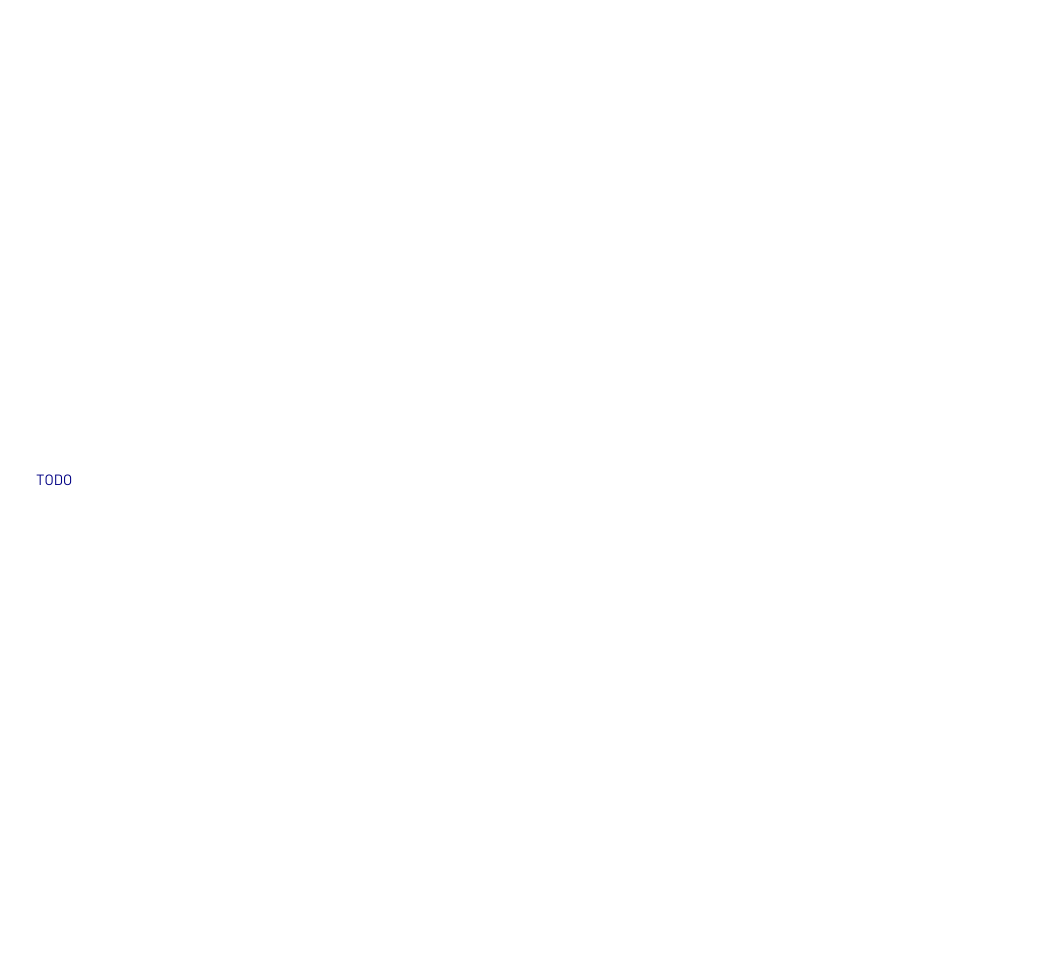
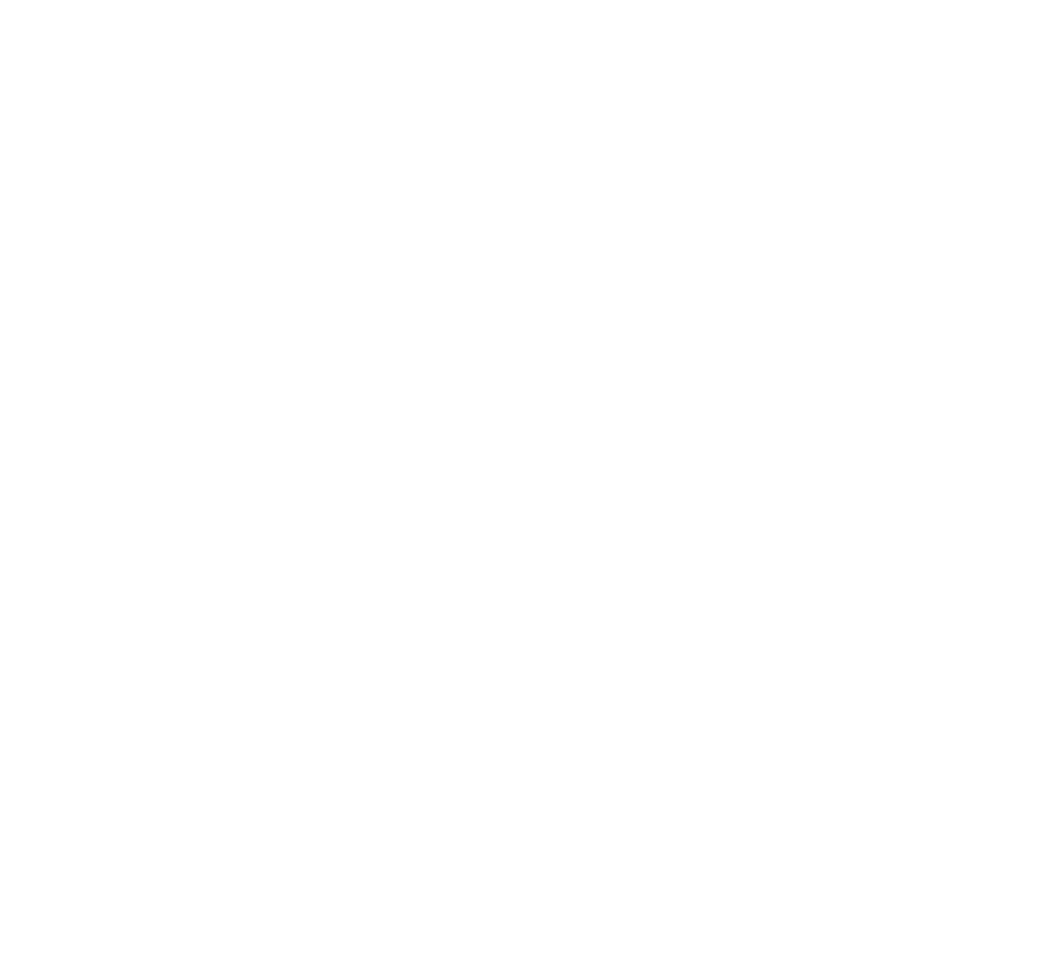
text: TODO (53, 479) -> none

